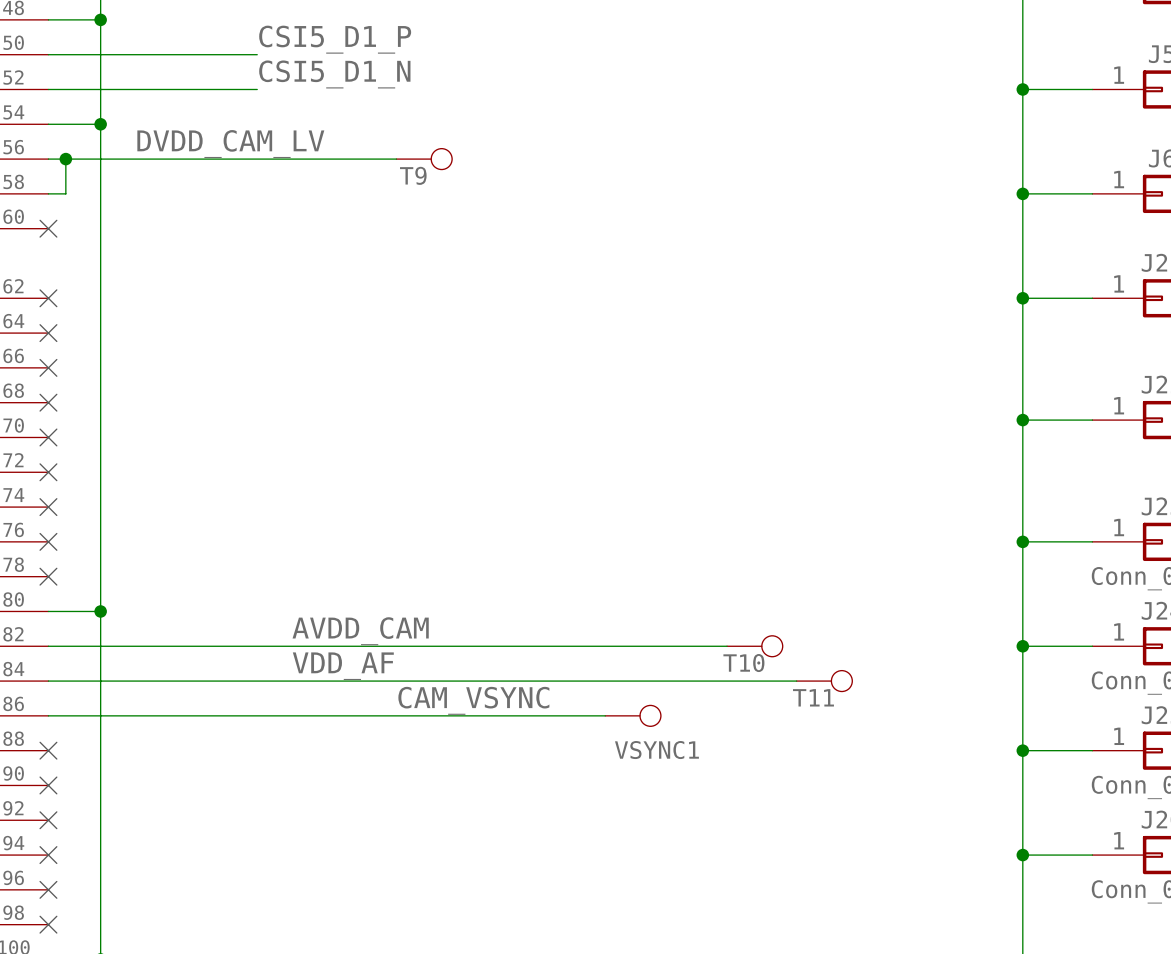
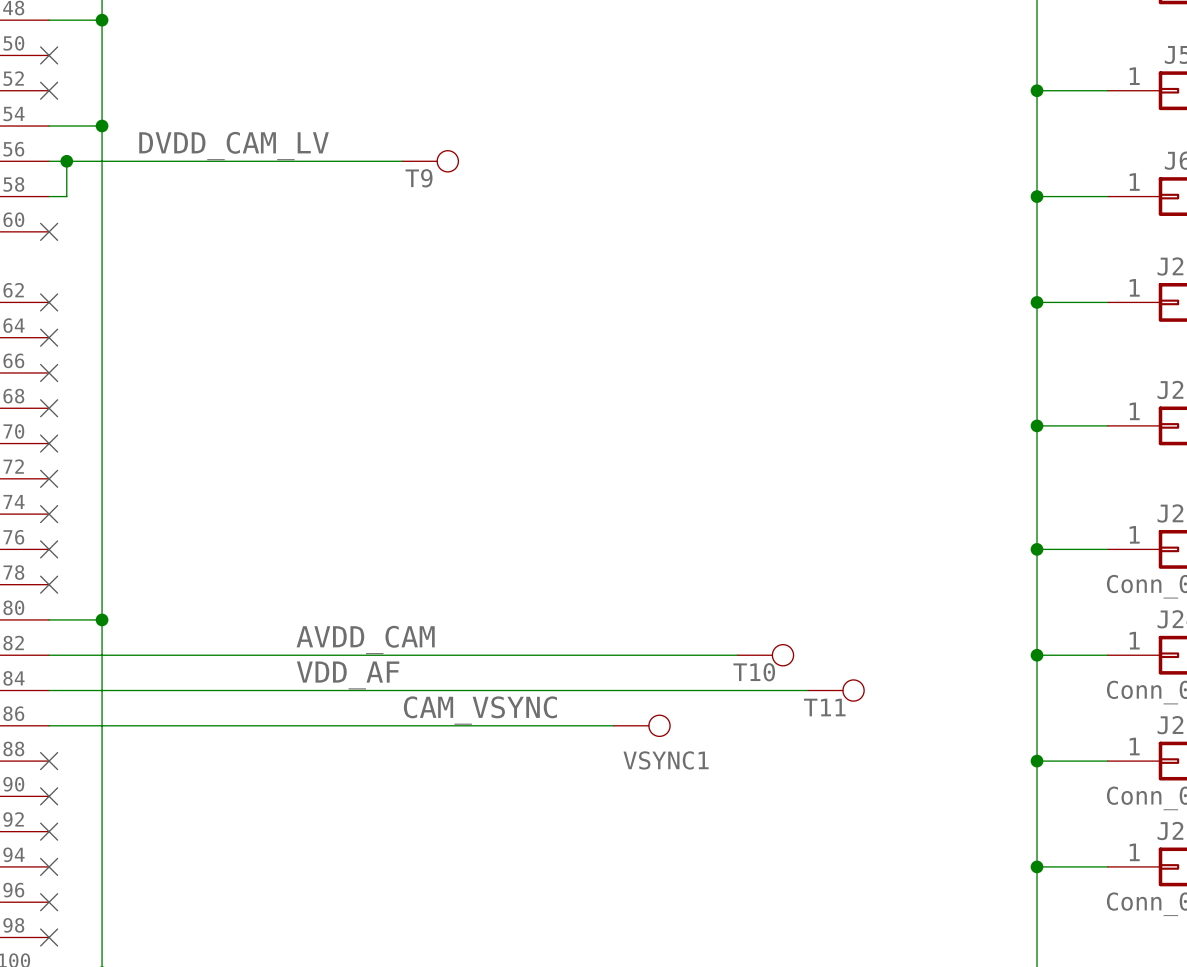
label: CSI5_D1_P (335, 39) -> none
wire: (48, 54) (257, 54) -> none
no-connect mark: none -> (49, 55)
label: CSI5_D1_N (334, 74) -> none
wire: (48, 89) (257, 89) -> none
no-connect mark: none -> (49, 90)

